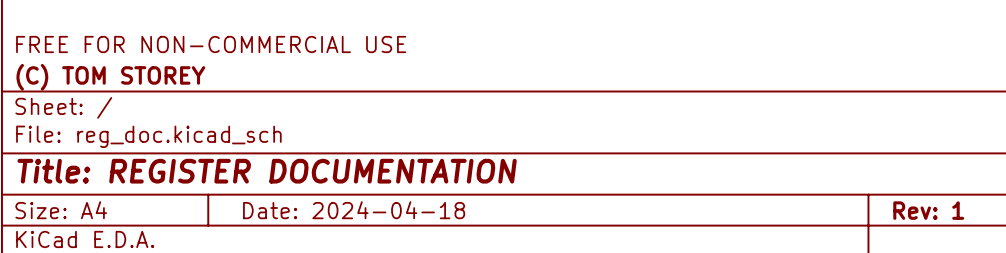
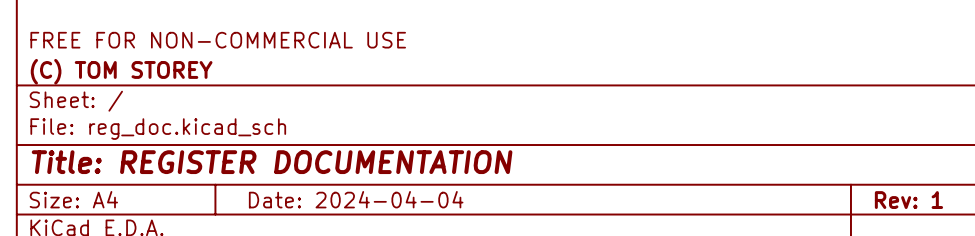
title block: Date: 2024-04-18 (354, 210) -> Date: 2024-04-04 (356, 199)

